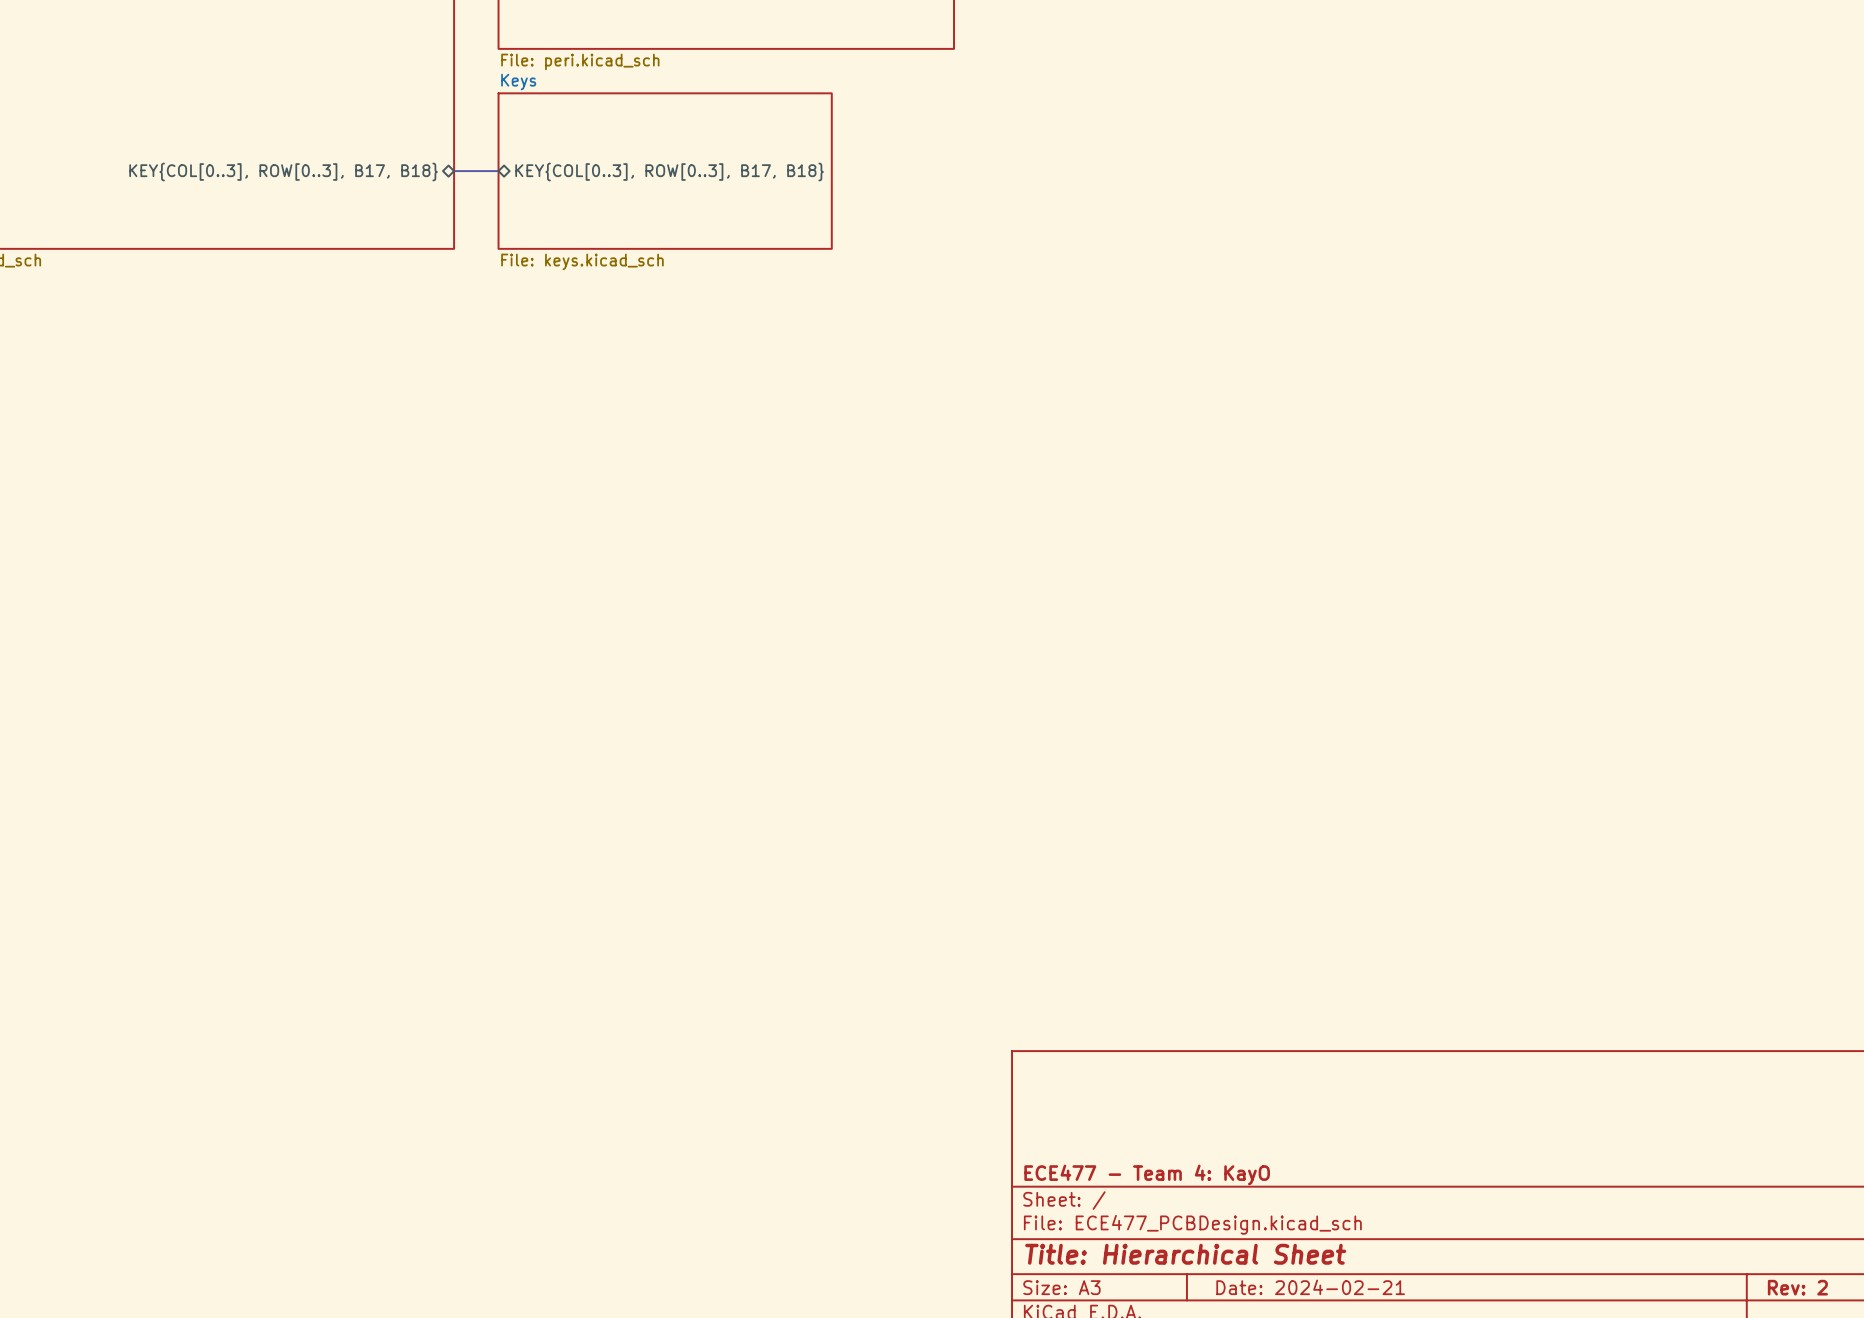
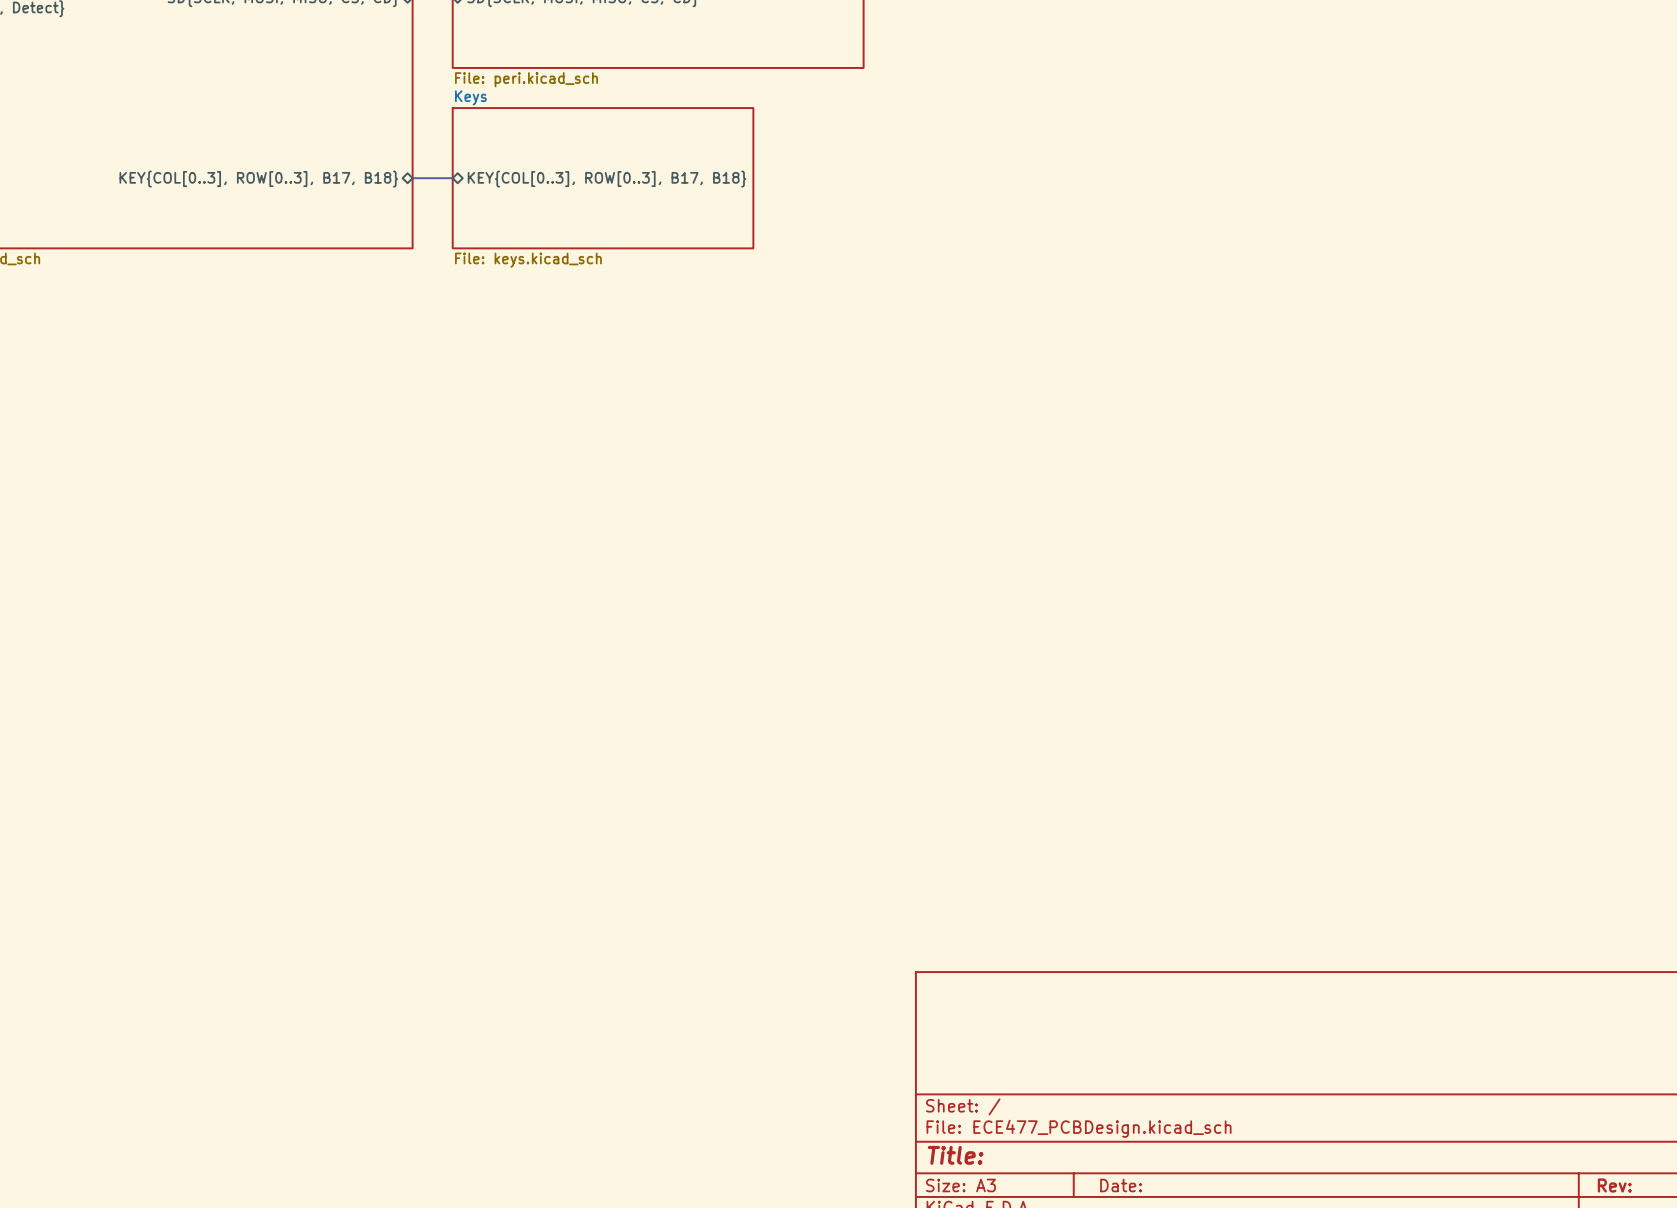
title block: ECE477 - Team 4: KayO (1147, 1174) -> none
title block: Title: Hierarchical Sheet (1185, 1254) -> Title: (955, 1155)
title block: Date: 2024-02-21 (1310, 1287) -> Date: (1121, 1185)
title block: Rev: 2 (1797, 1287) -> Rev: (1614, 1185)

